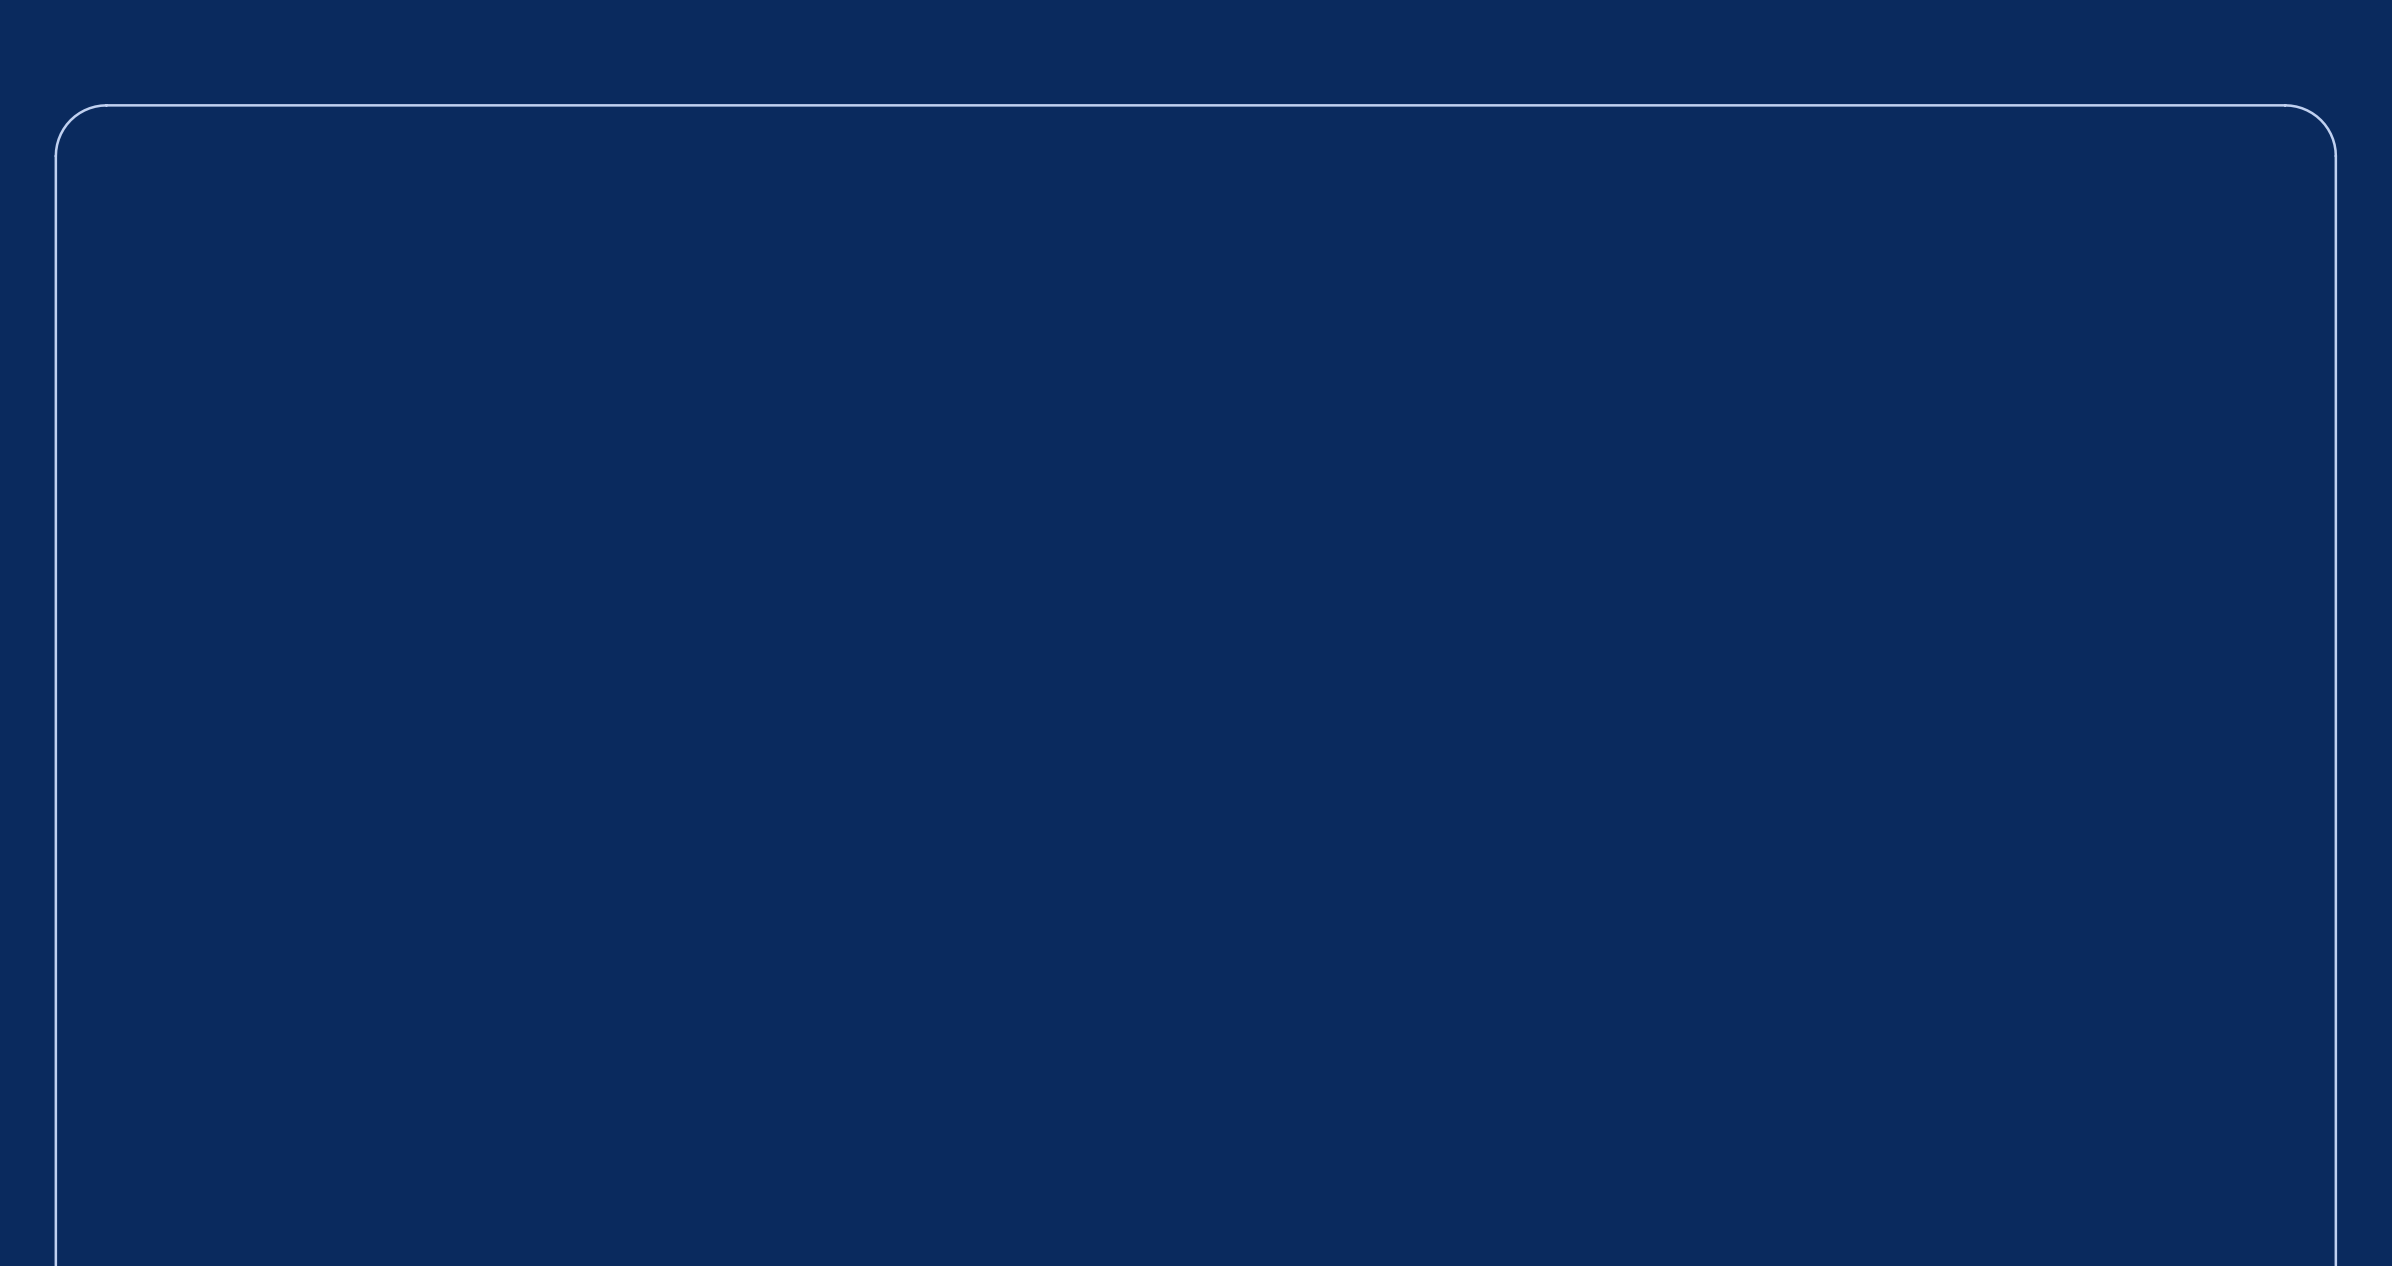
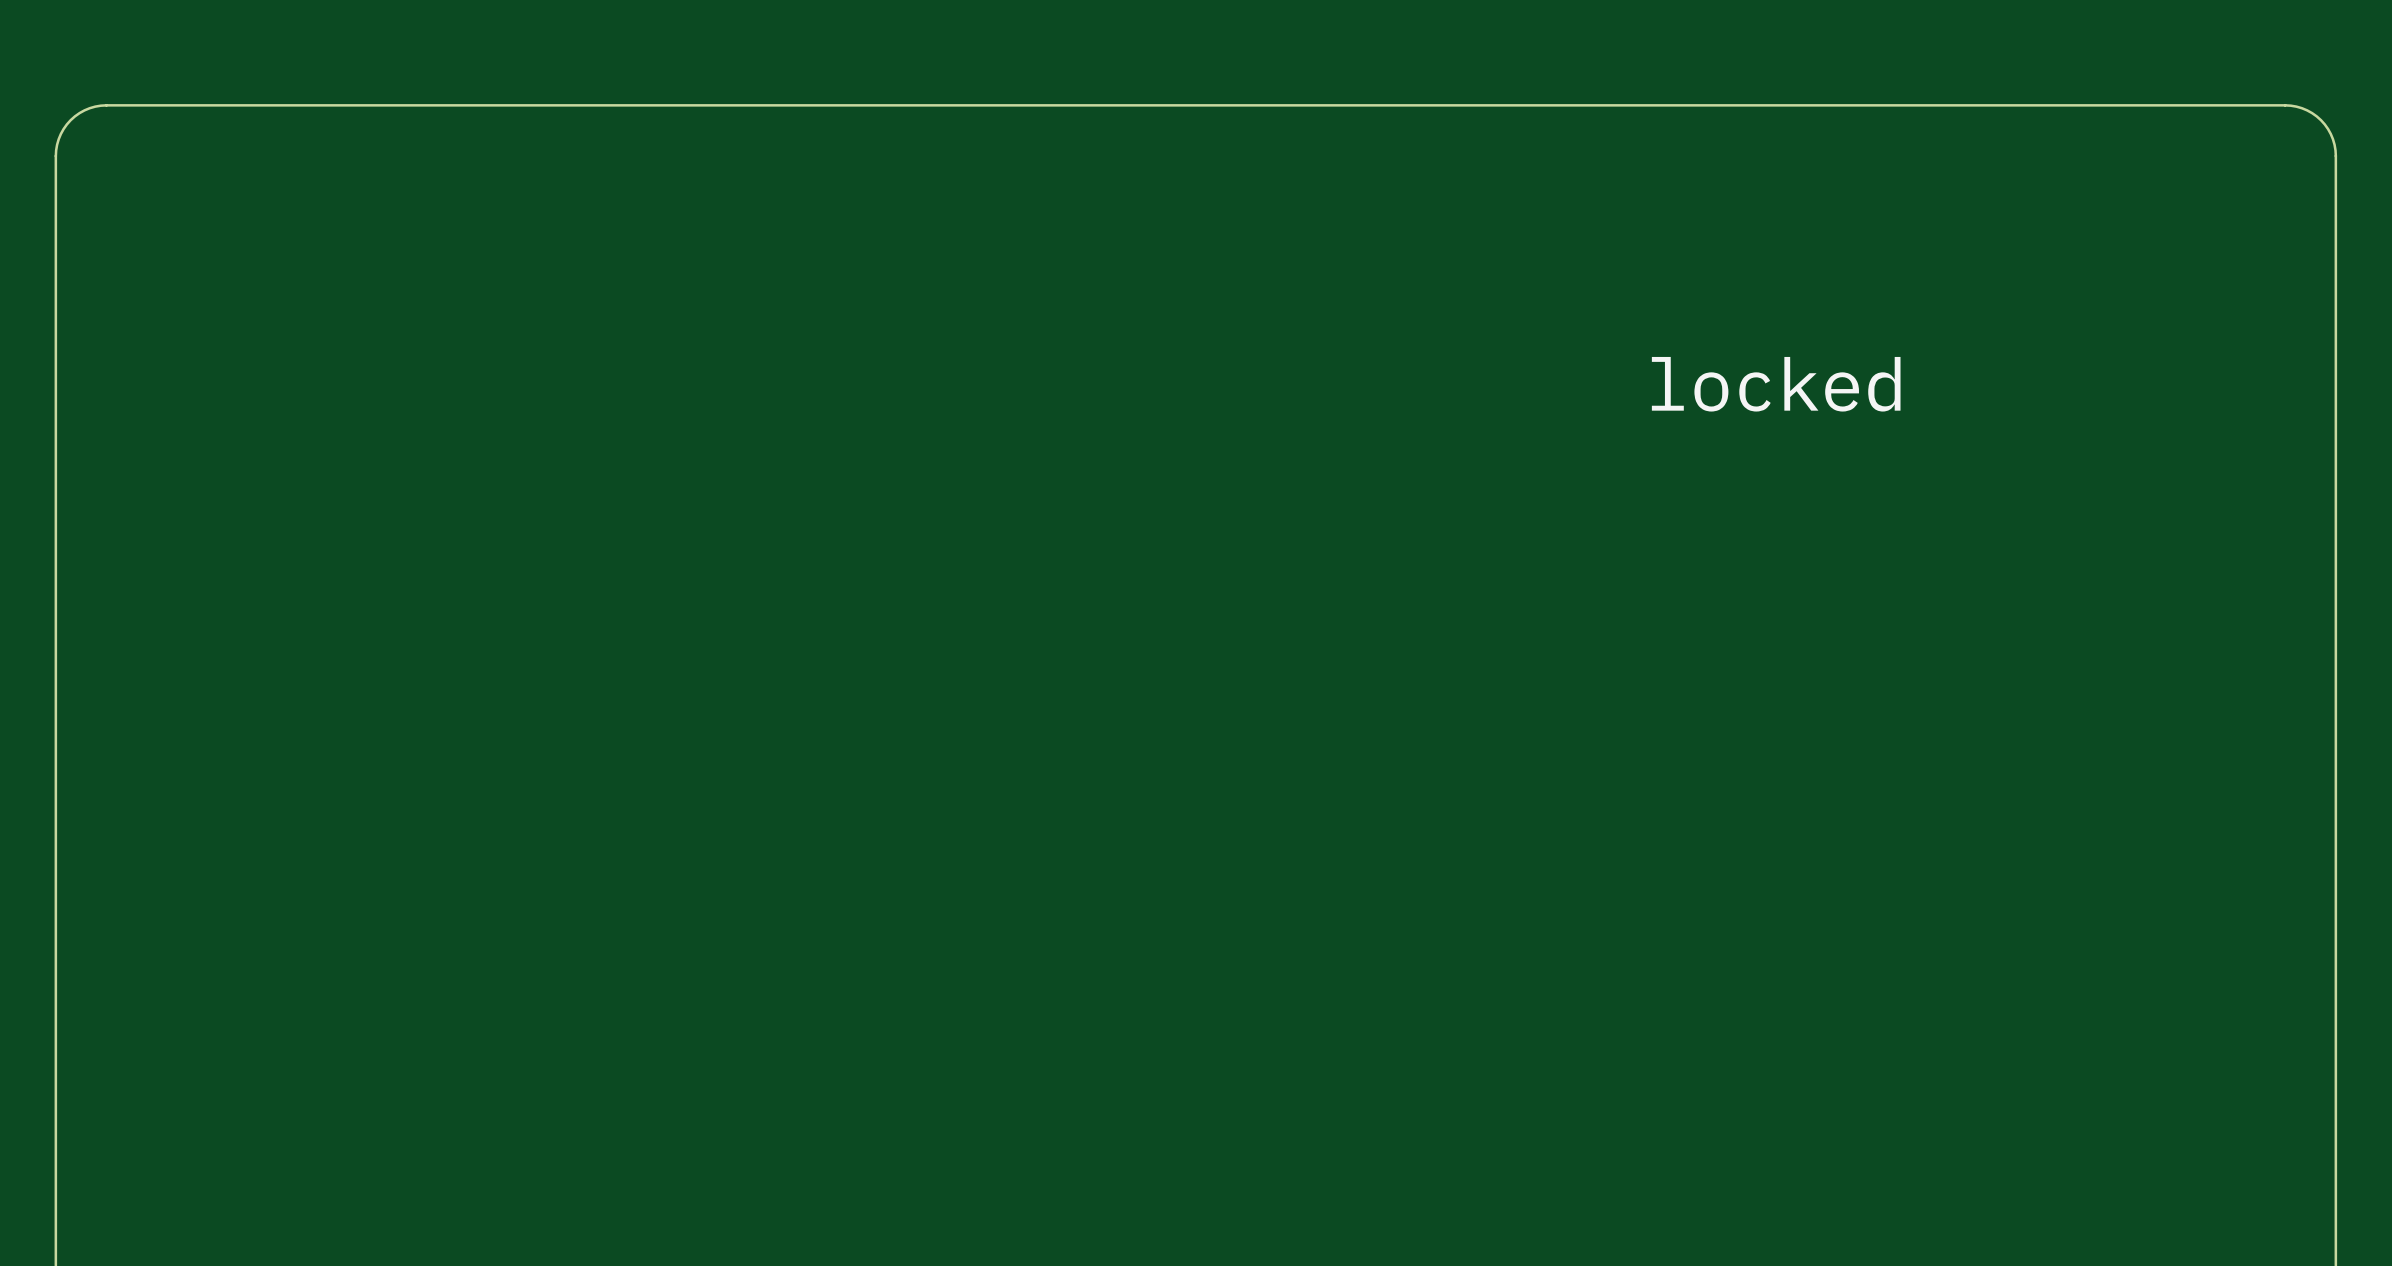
text: none -> locked (1776, 384)

